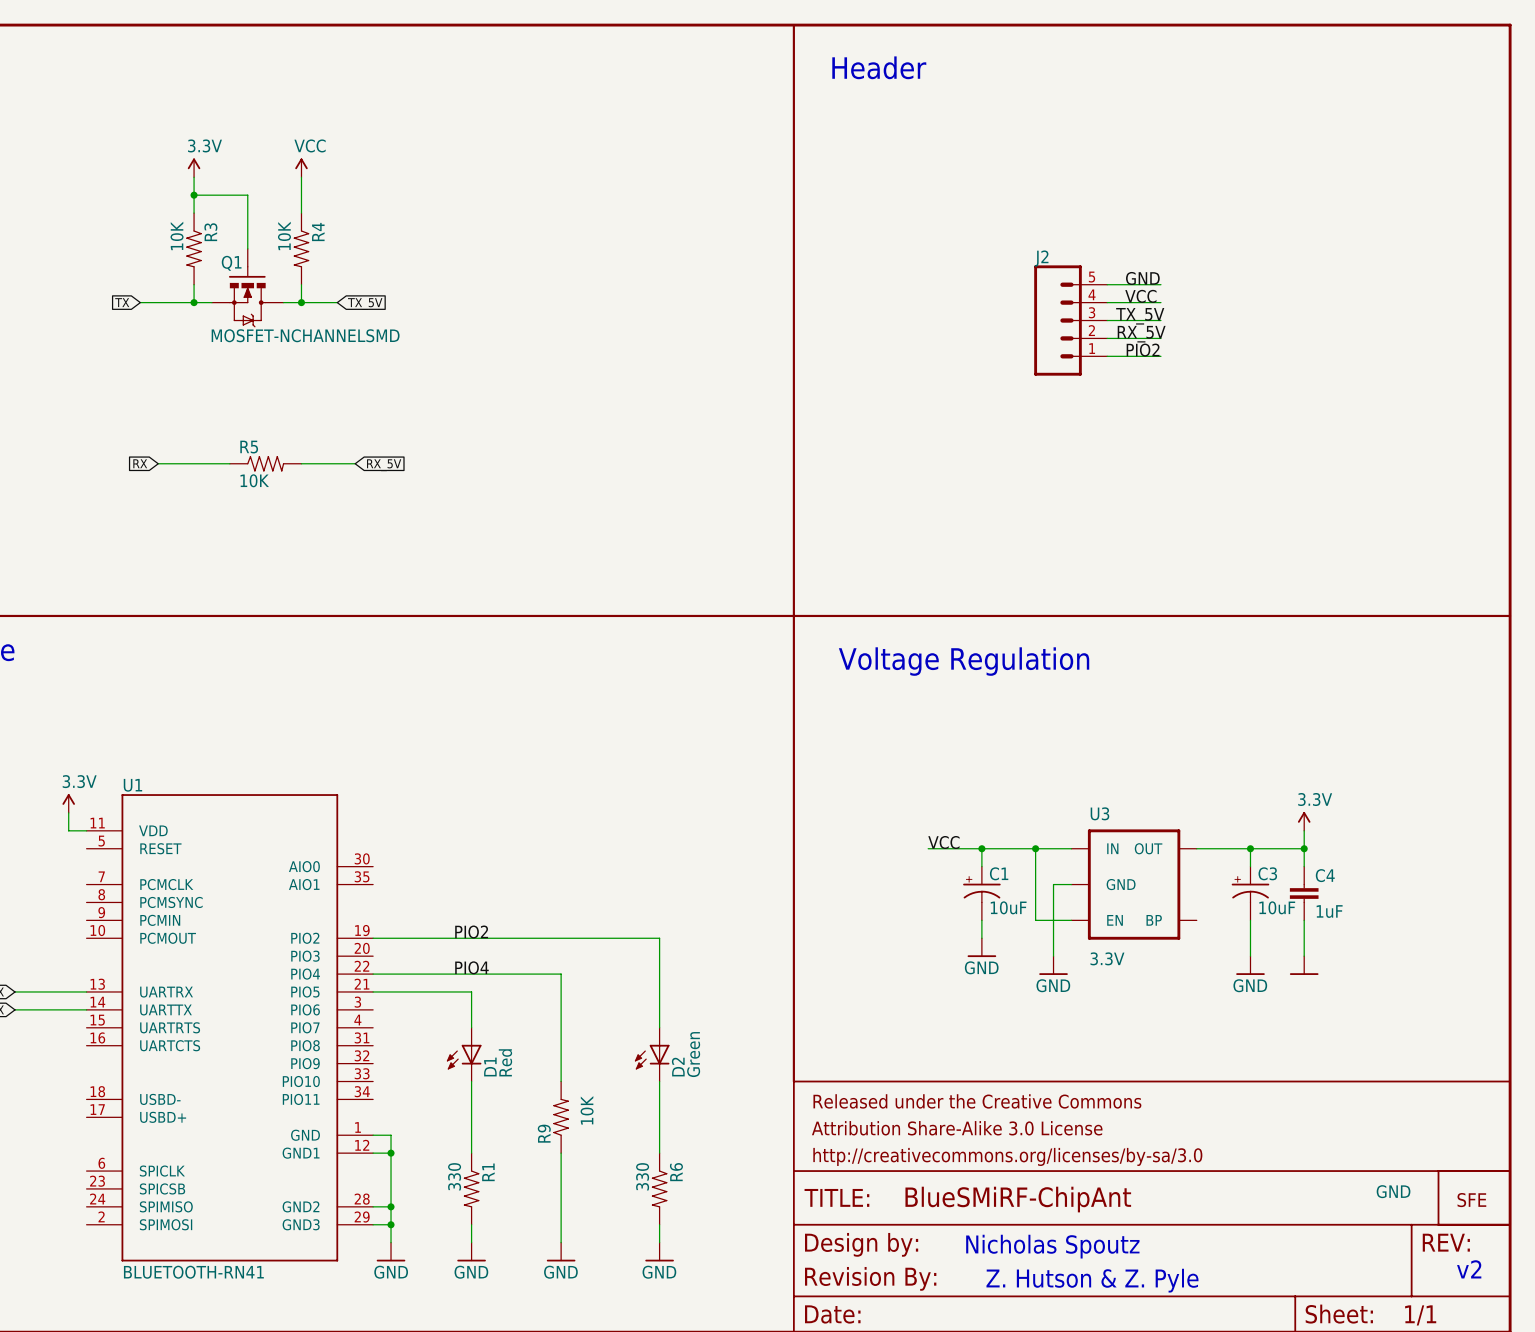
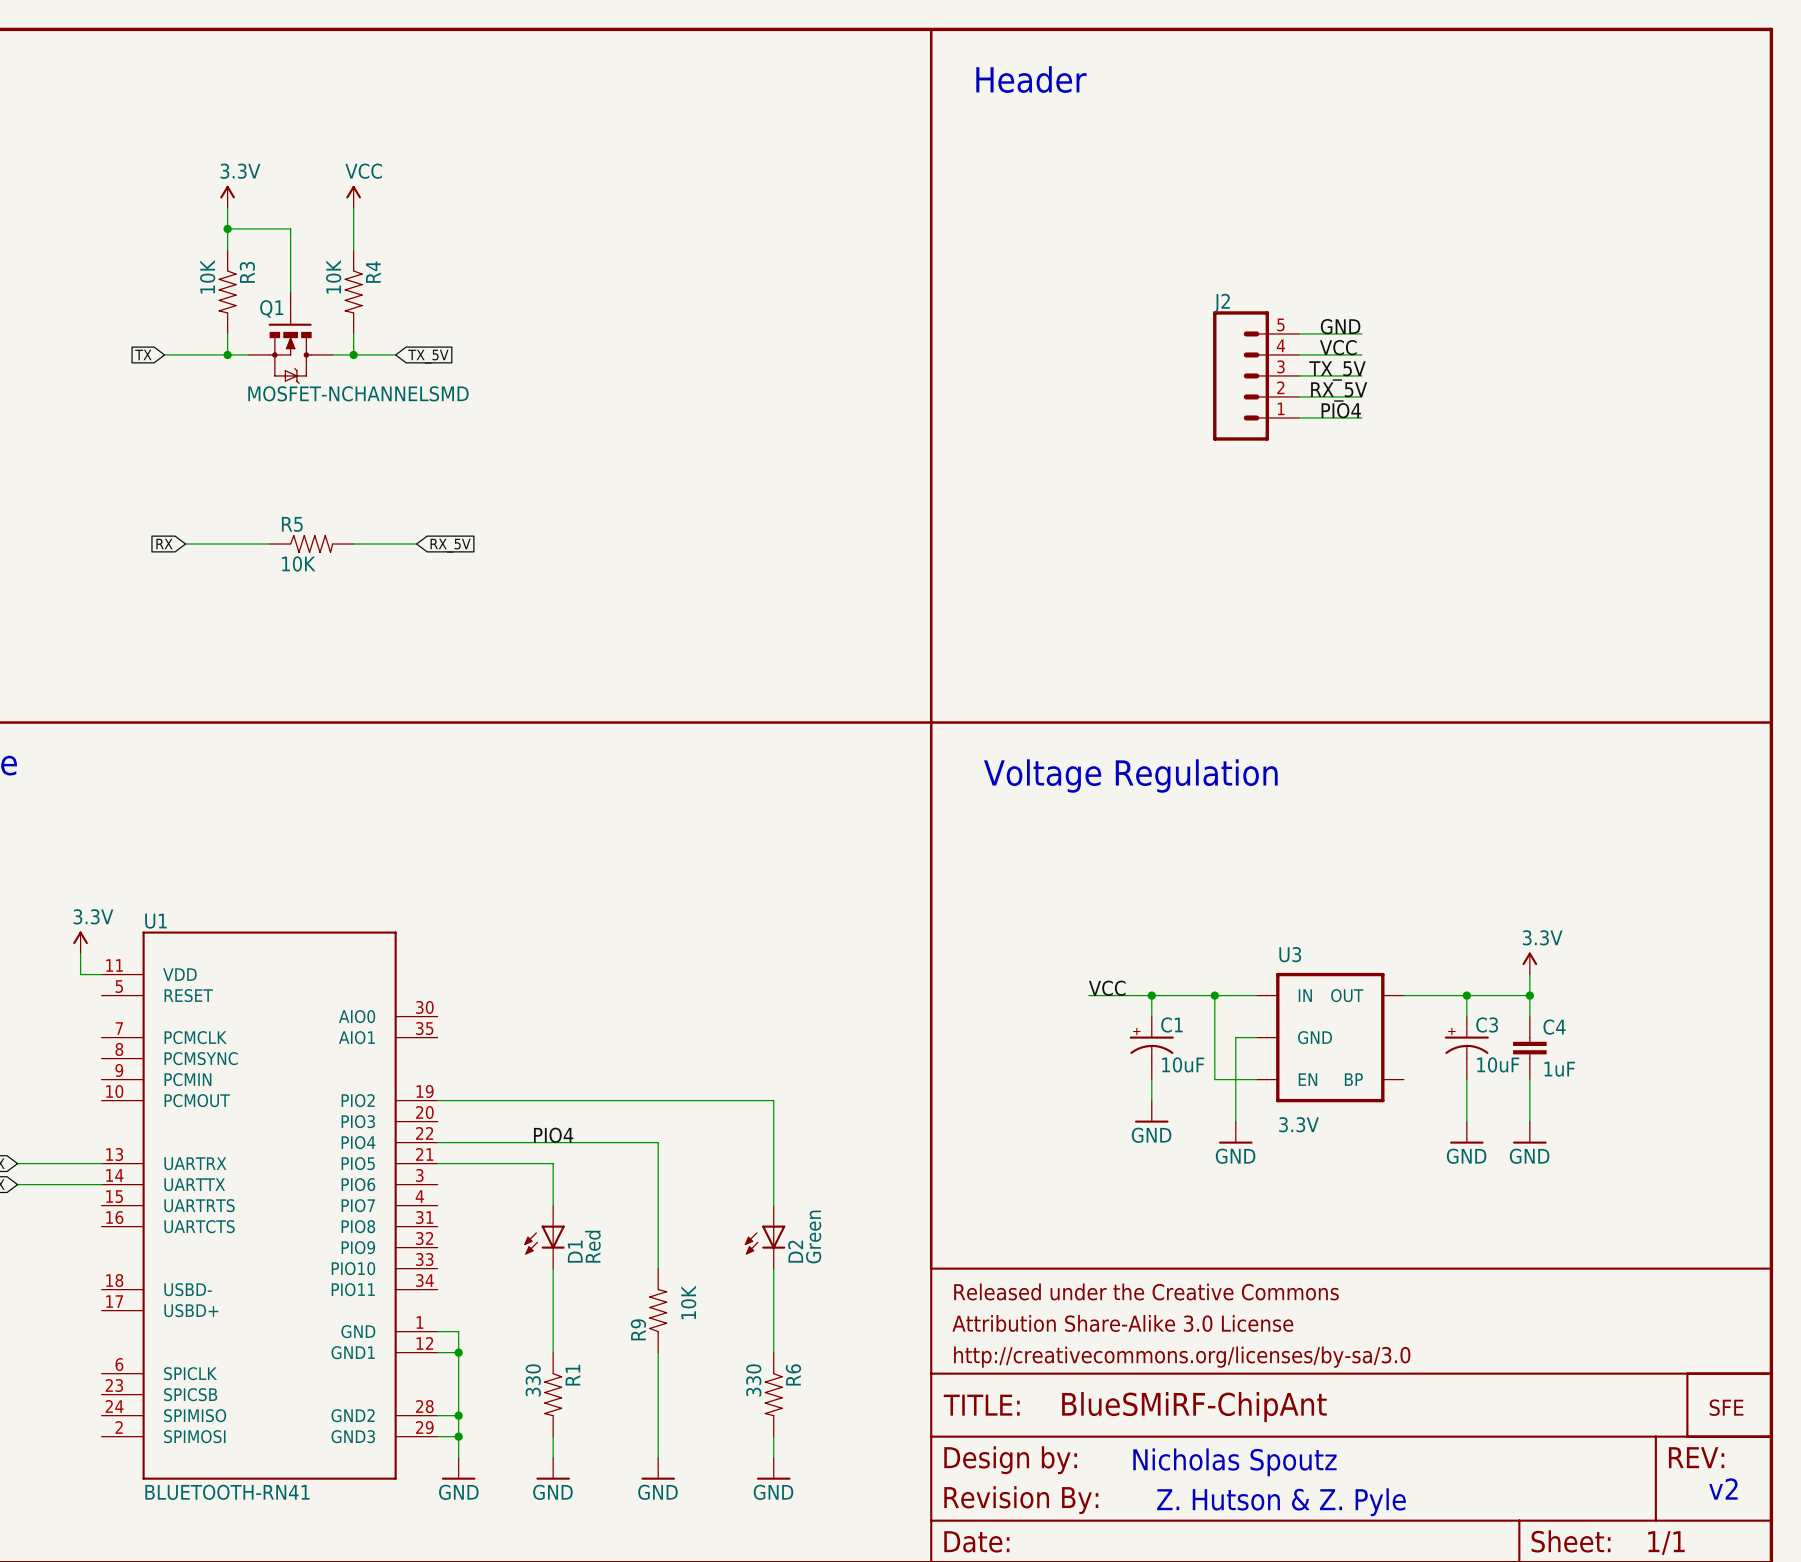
label: PIO2 (1143, 350) -> PIO4 (1341, 410)
label: PIO2 (471, 932) -> none
power symbol text position: GND (1393, 1191) -> GND (1529, 1156)

